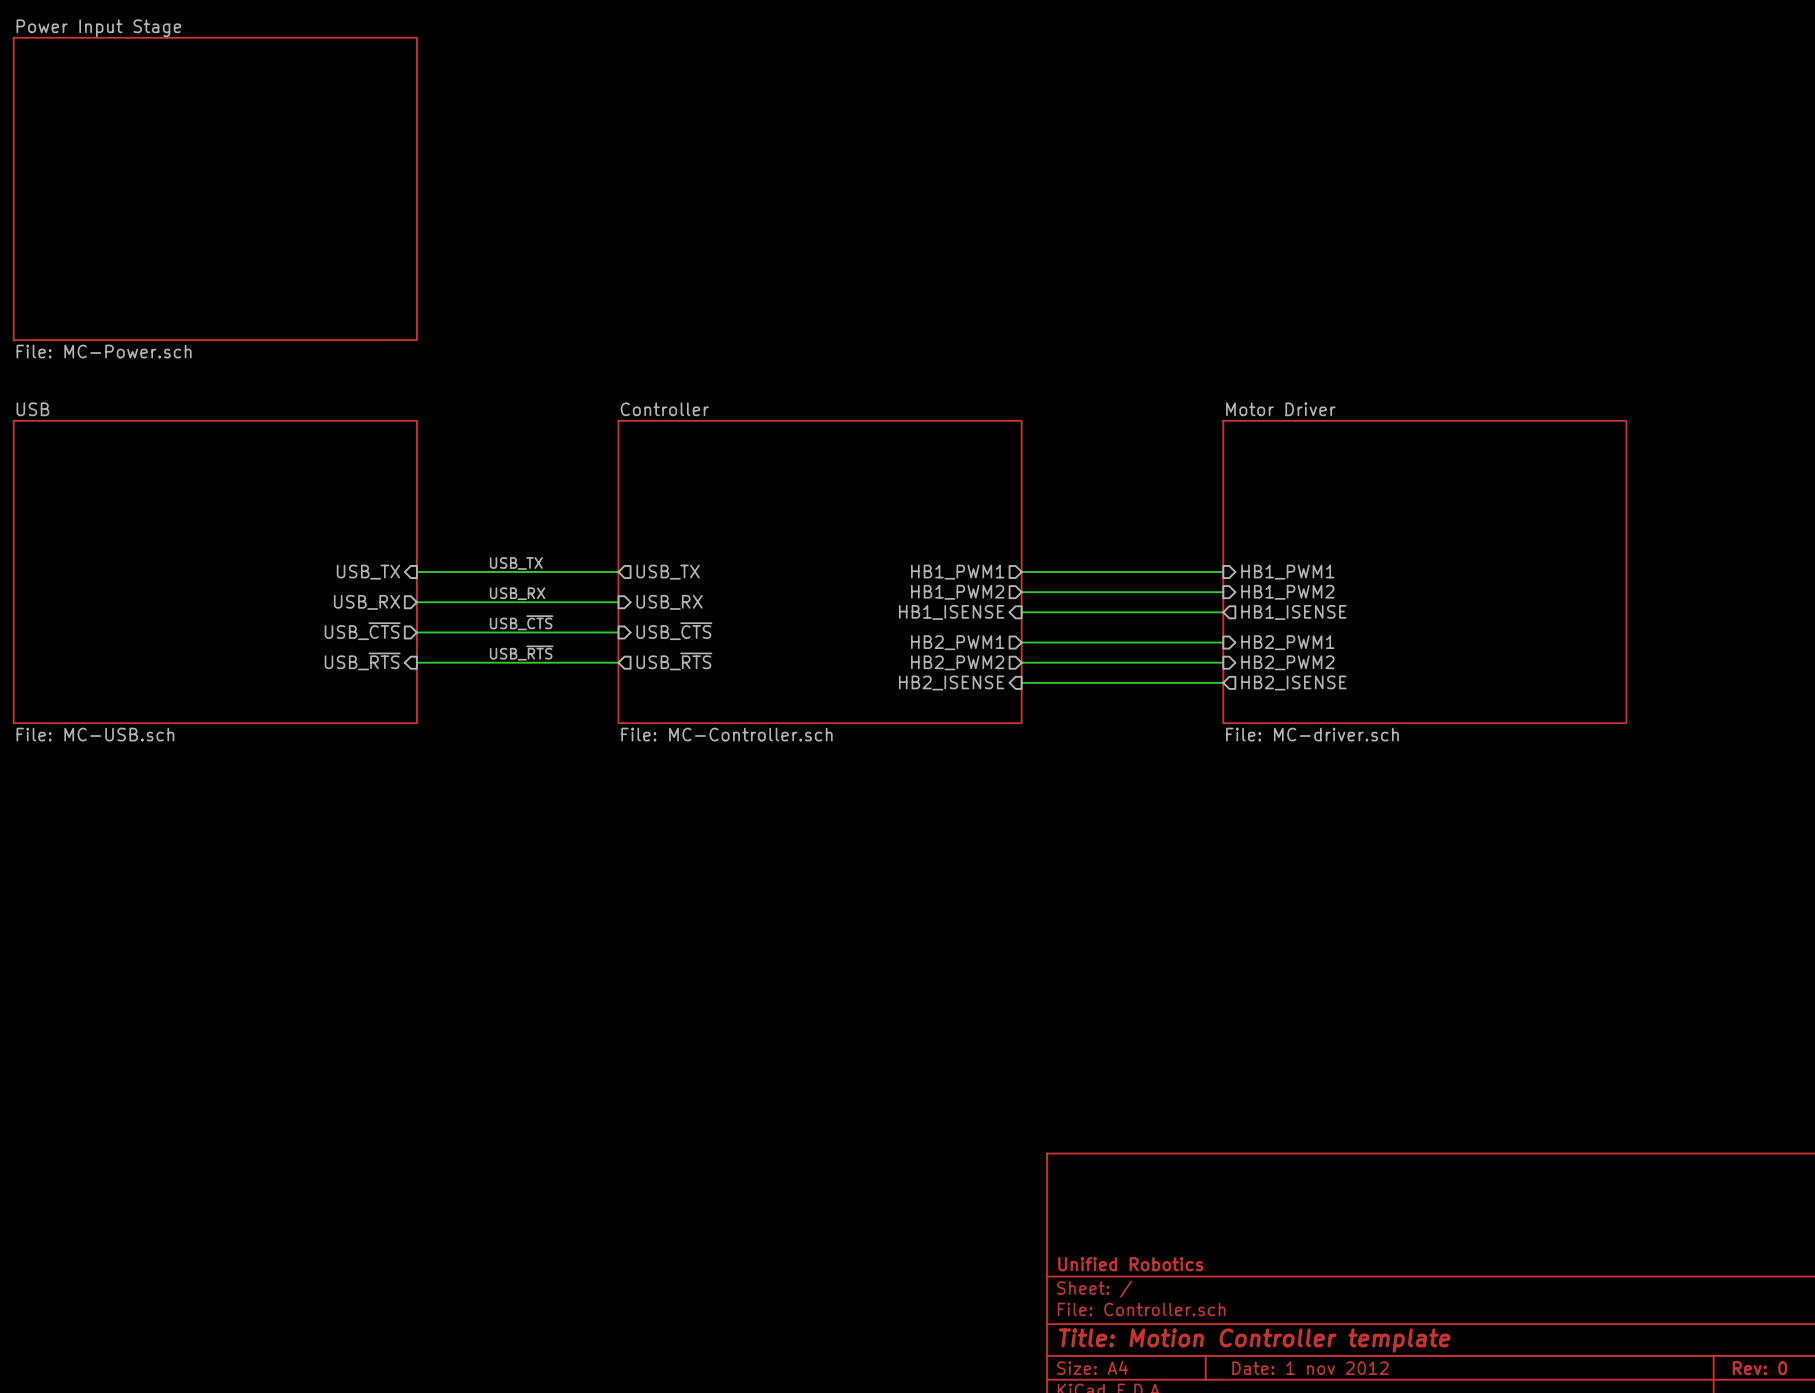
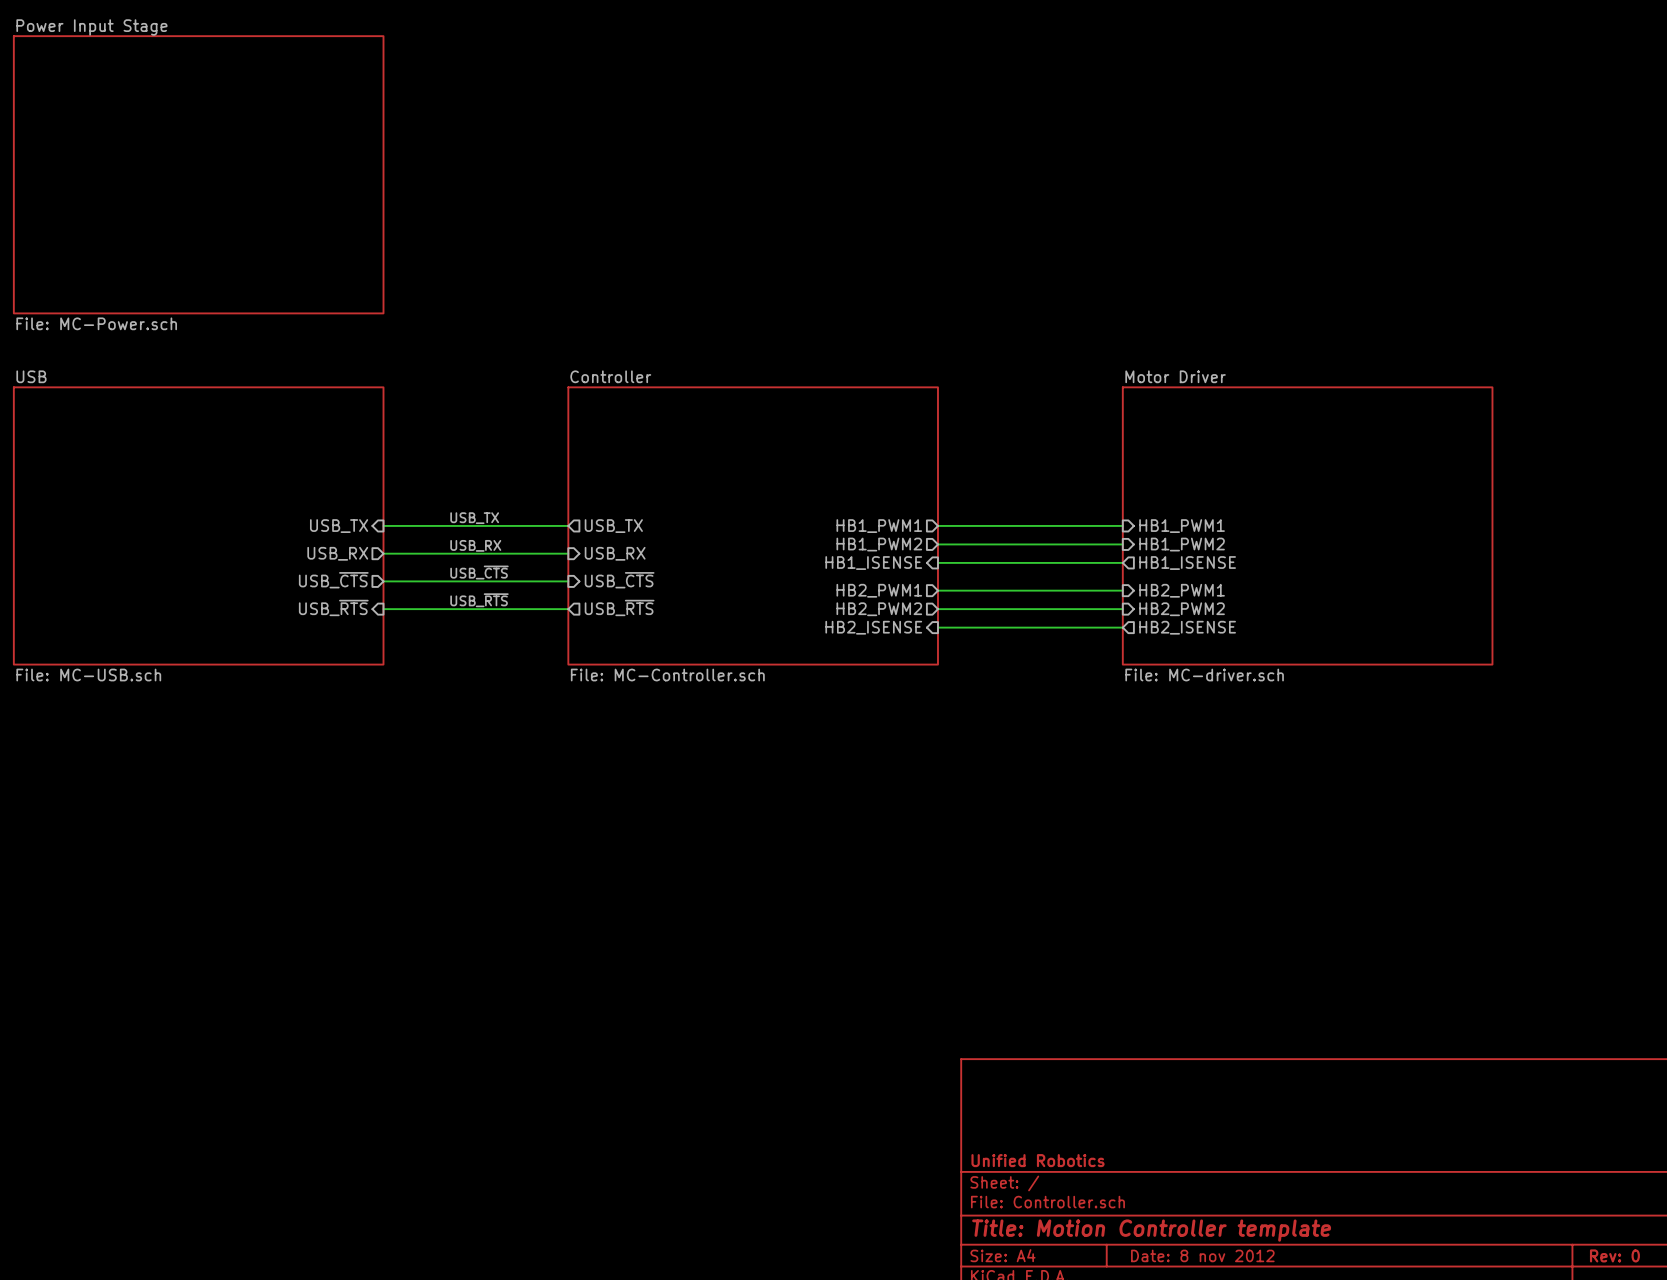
title block: Date: 1 nov 2012 (1310, 1368) -> Date: 8 nov 2012 (1202, 1255)

